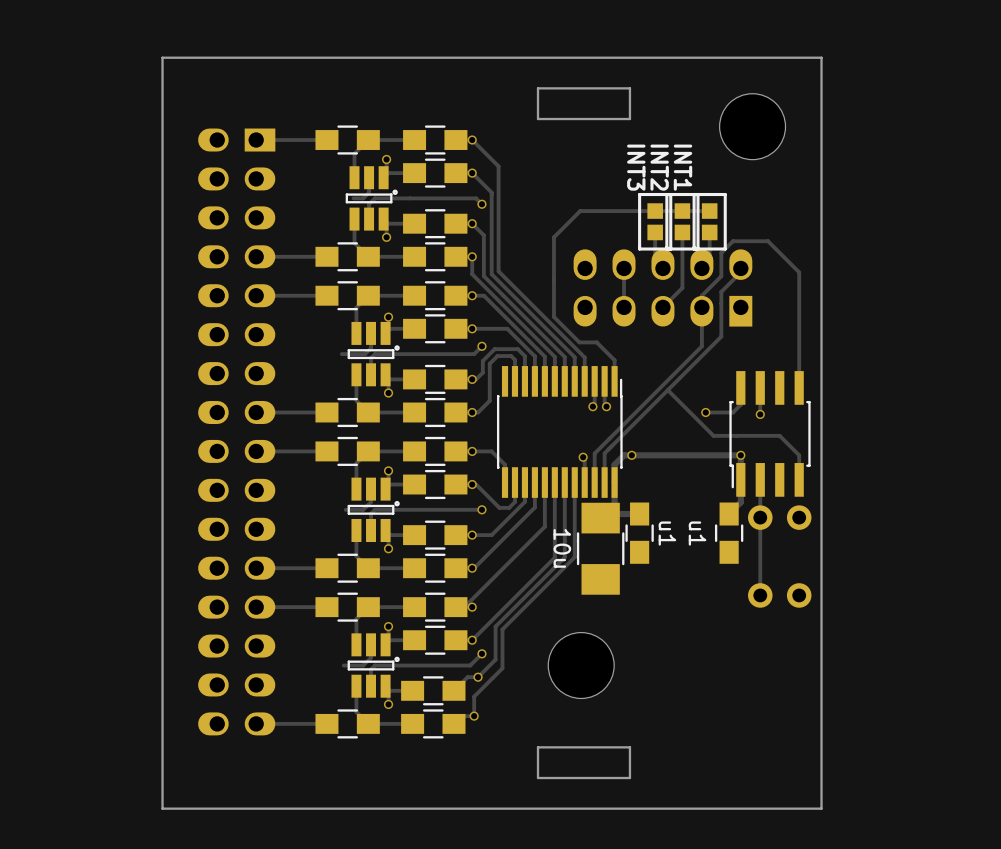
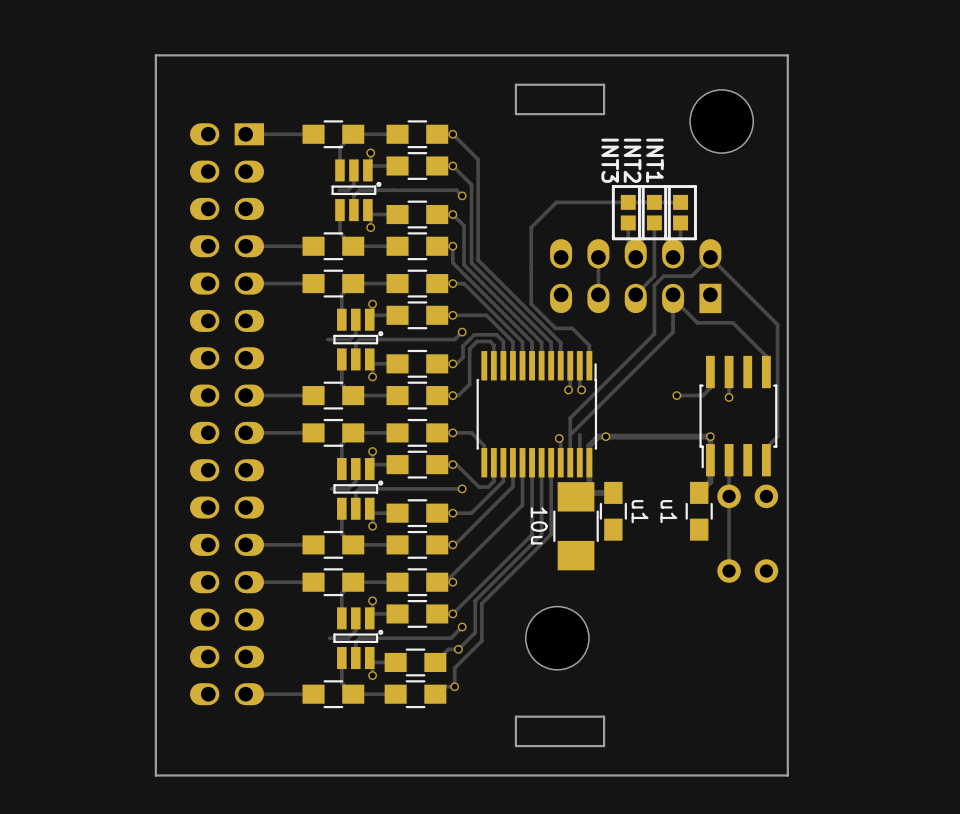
track: (740, 268) (740, 272) (721, 291) (721, 336) (604, 453) -> none
track: (701, 307) (701, 295) (721, 276) (721, 252) (733, 241) (768, 241) (799, 272) (799, 371) -> (673, 298) (697, 322) (732, 322) (766, 356)
track: (667, 390) (713, 435) (779, 435) (799, 455) (799, 466) -> (570, 434) (570, 418) (654, 333) (654, 285) (663, 276) (691, 276) (710, 257) (777, 324) (777, 436) (766, 447)

